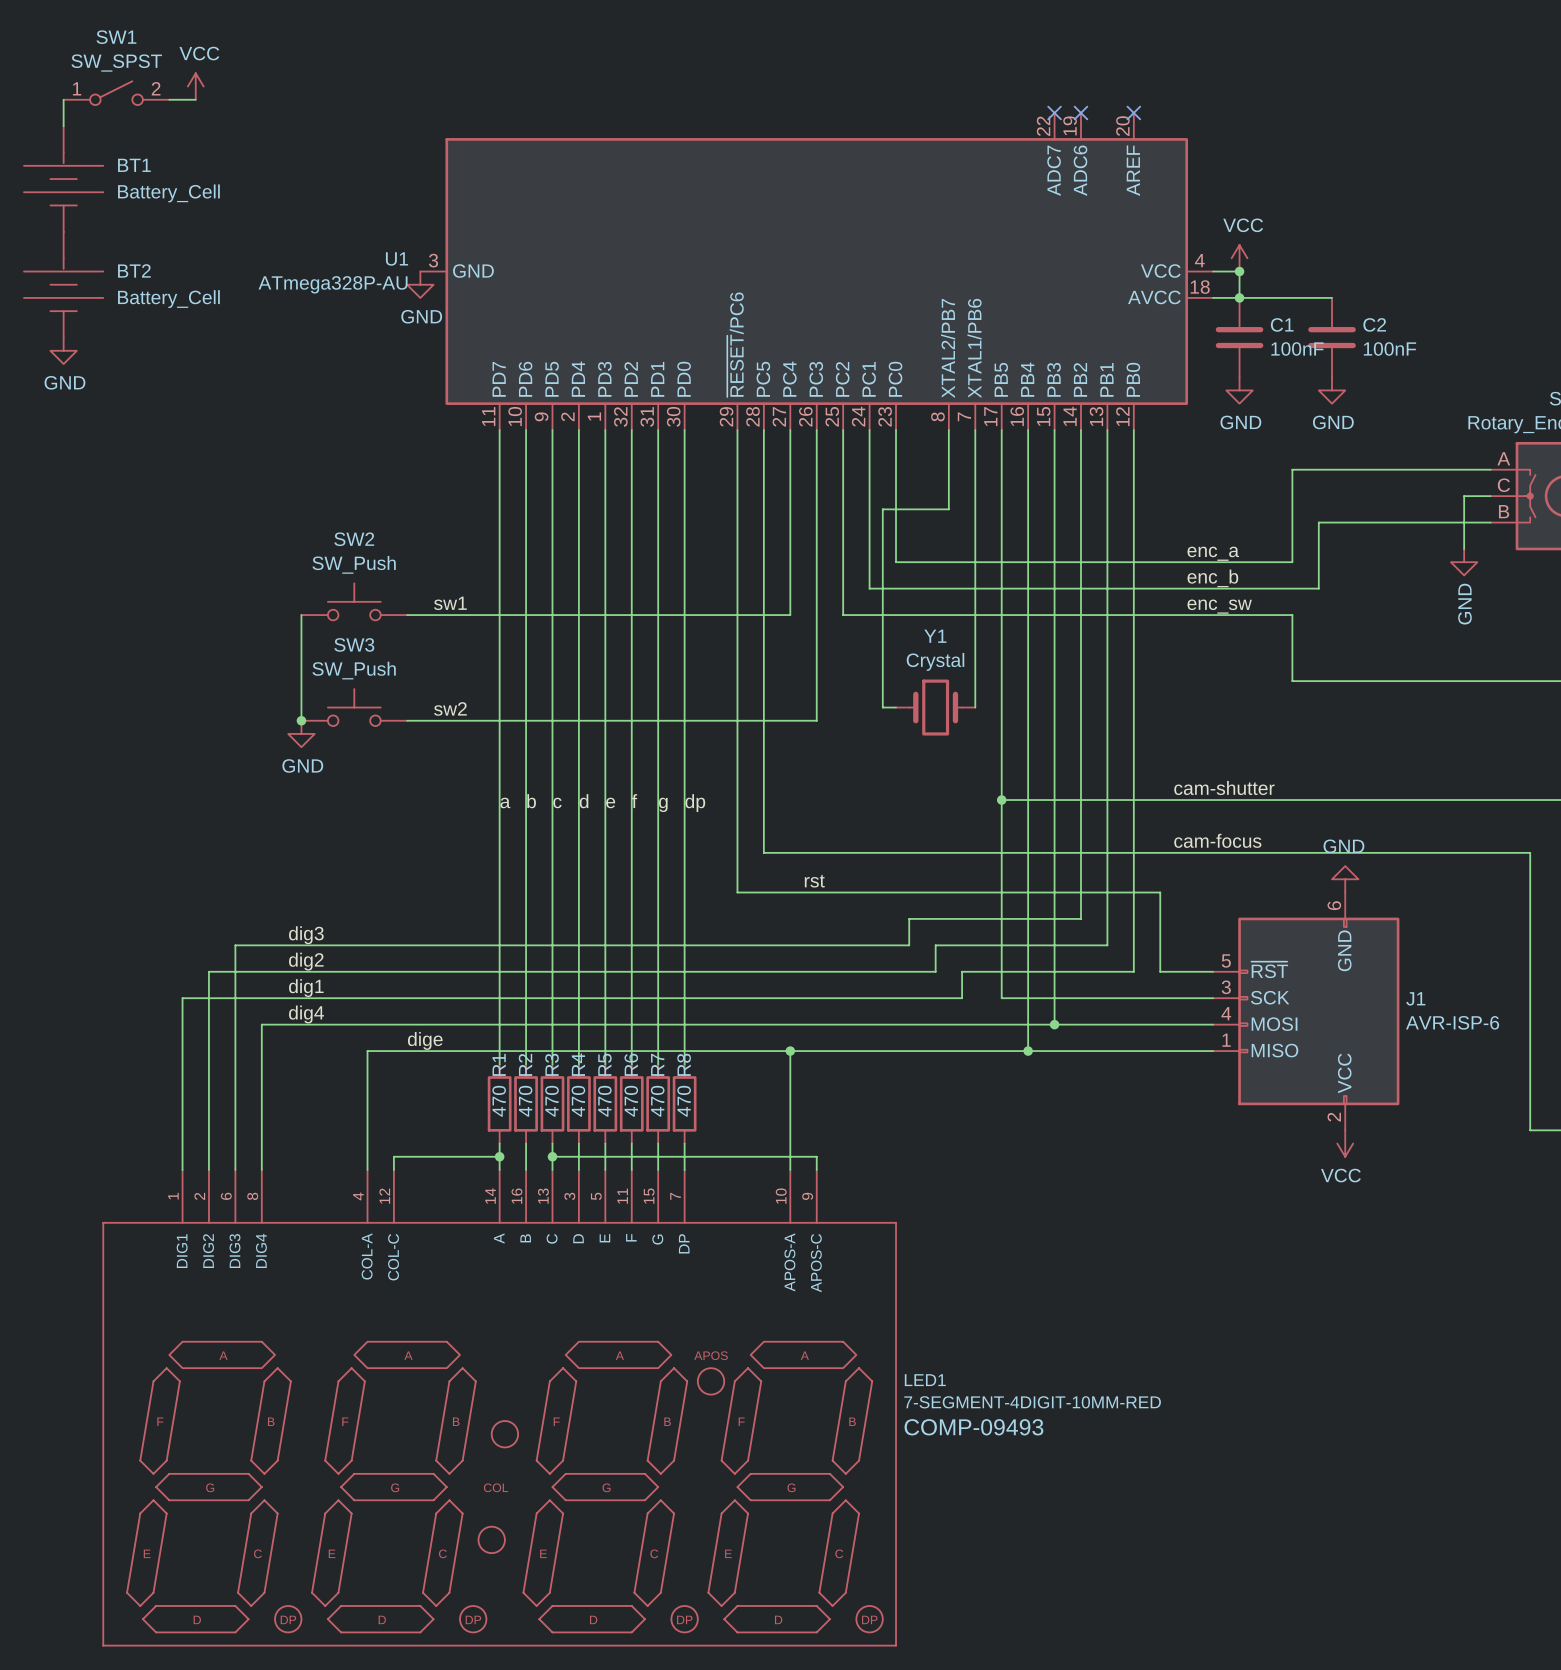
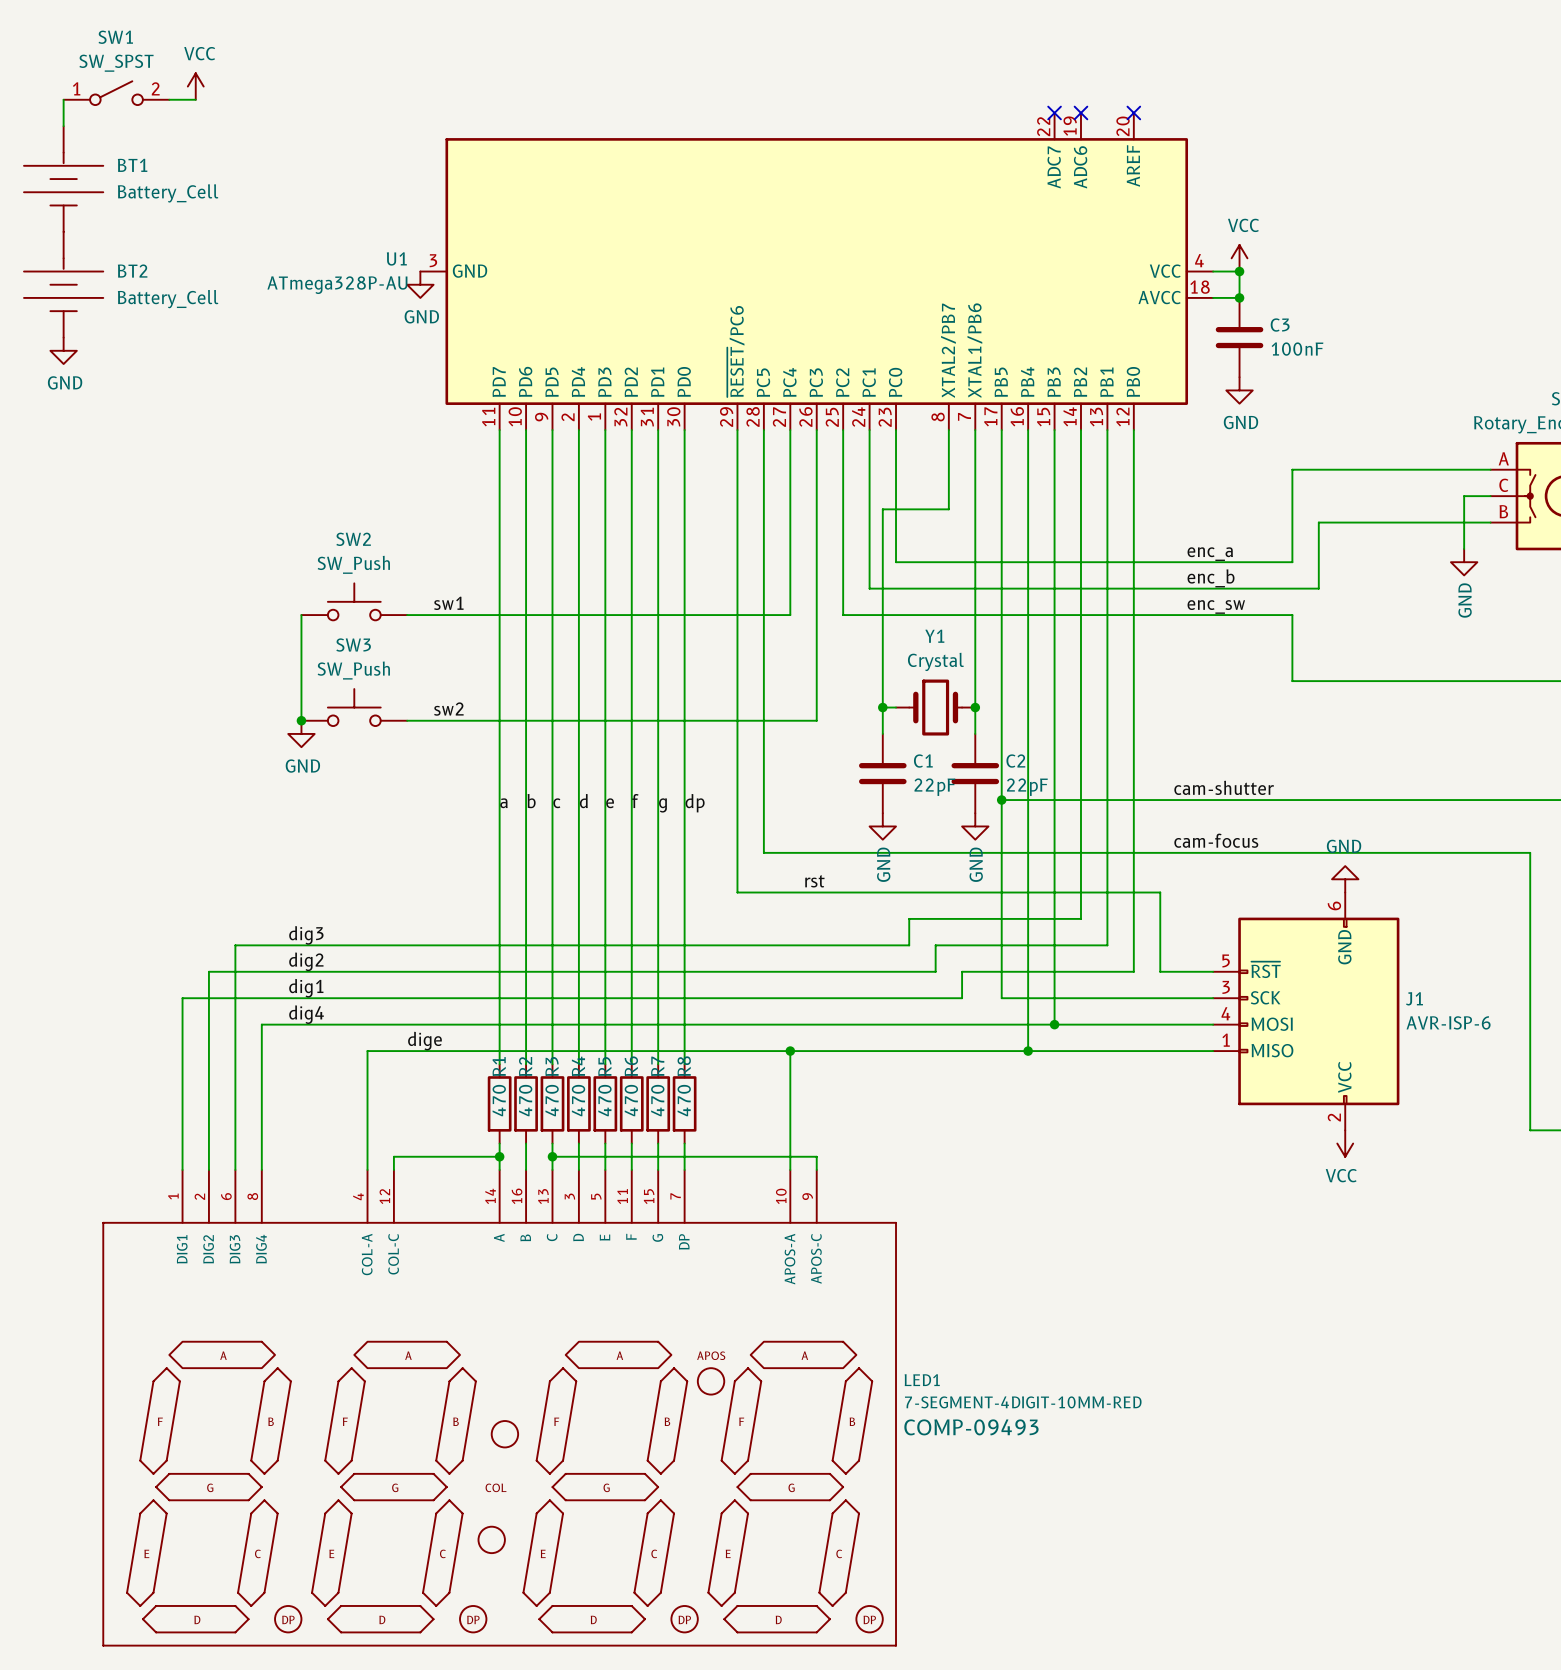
wire: (1239, 297) (1332, 297) -> none
C1 name: C1 (1282, 324) -> C3 (1280, 325)
C2 position: (1332, 337) -> (975, 773)
C2 value: 100nF (1389, 348) -> 22pF (1027, 787)
power symbol: GND (1332, 390) -> none
wire: none -> (882, 707) (882, 733)
junction: none -> (882, 707)
wire: none -> (975, 707) (975, 733)
junction: none -> (975, 707)
C1: none -> 22pF (882, 773)
power symbol: none -> GND (882, 826)
power symbol: none -> GND (975, 826)

